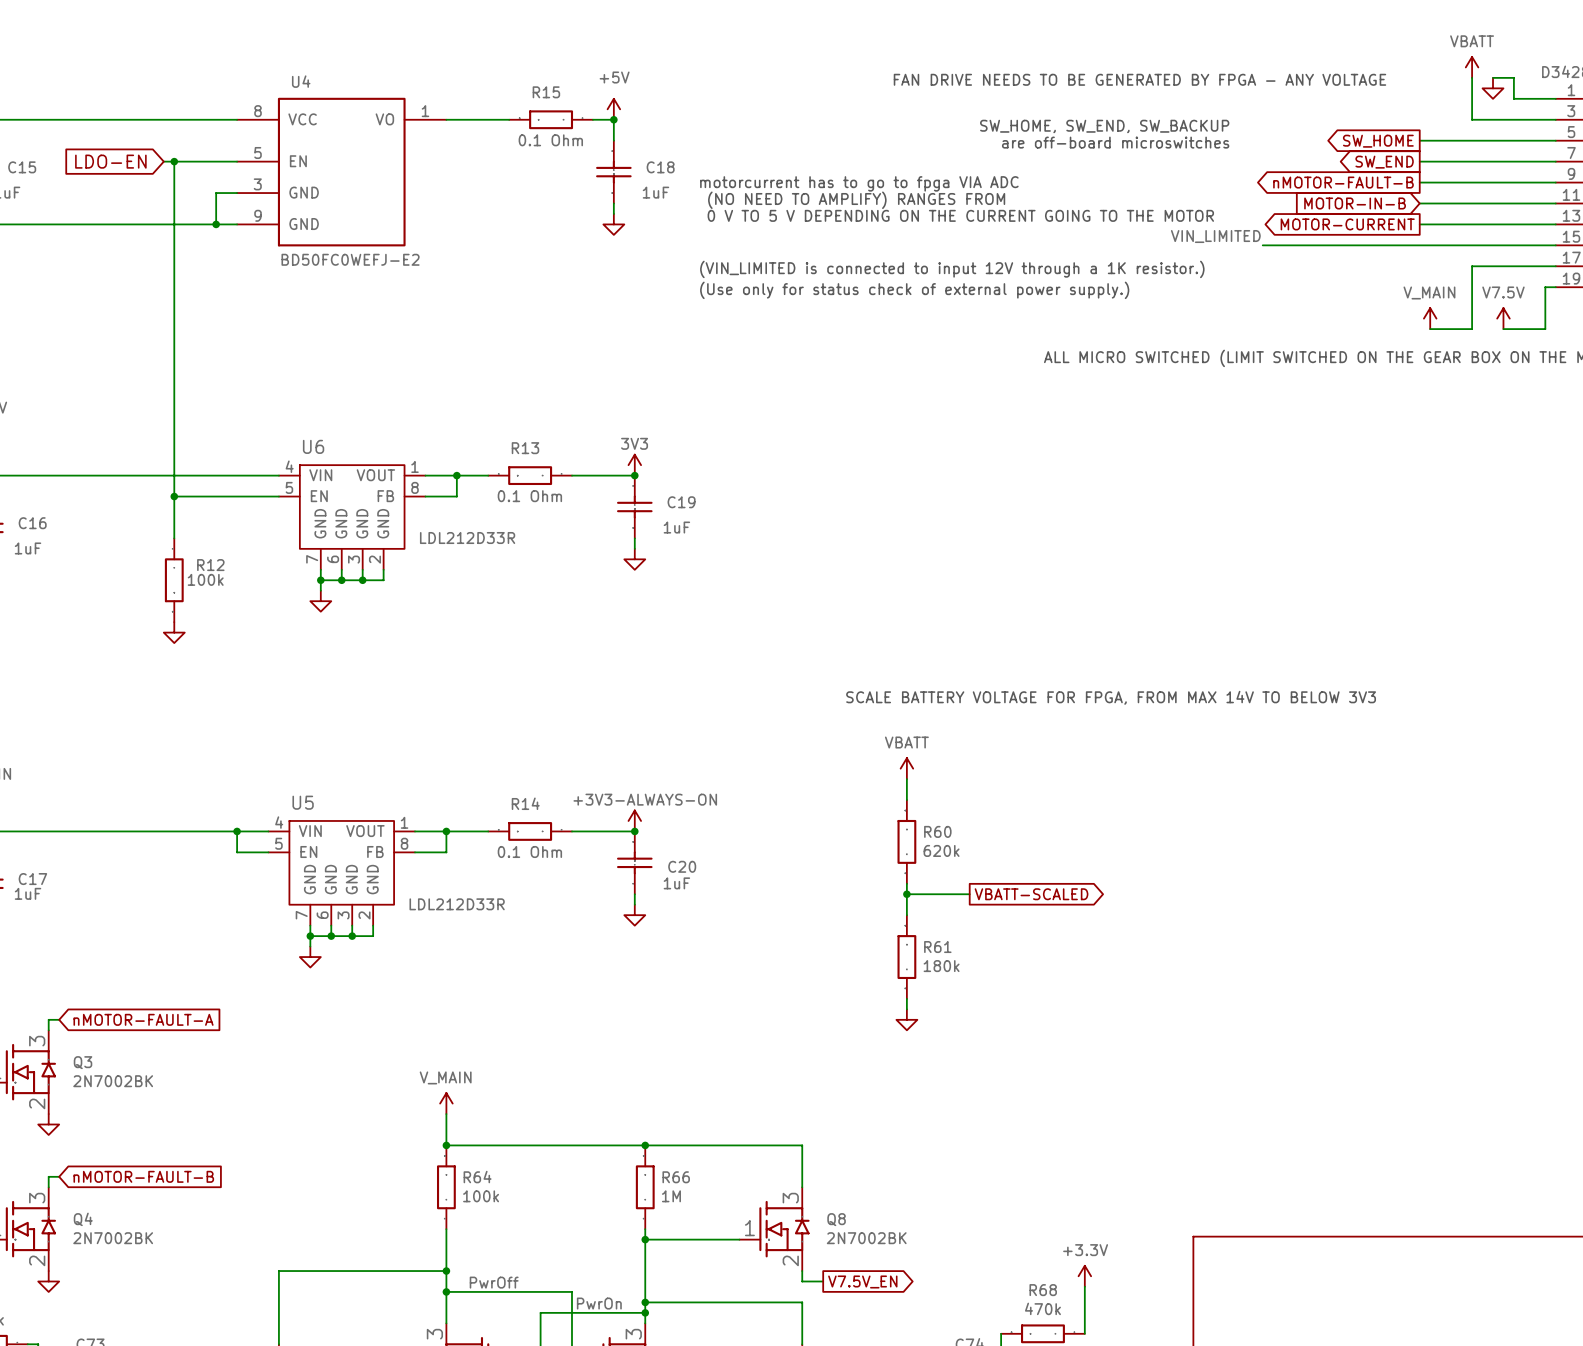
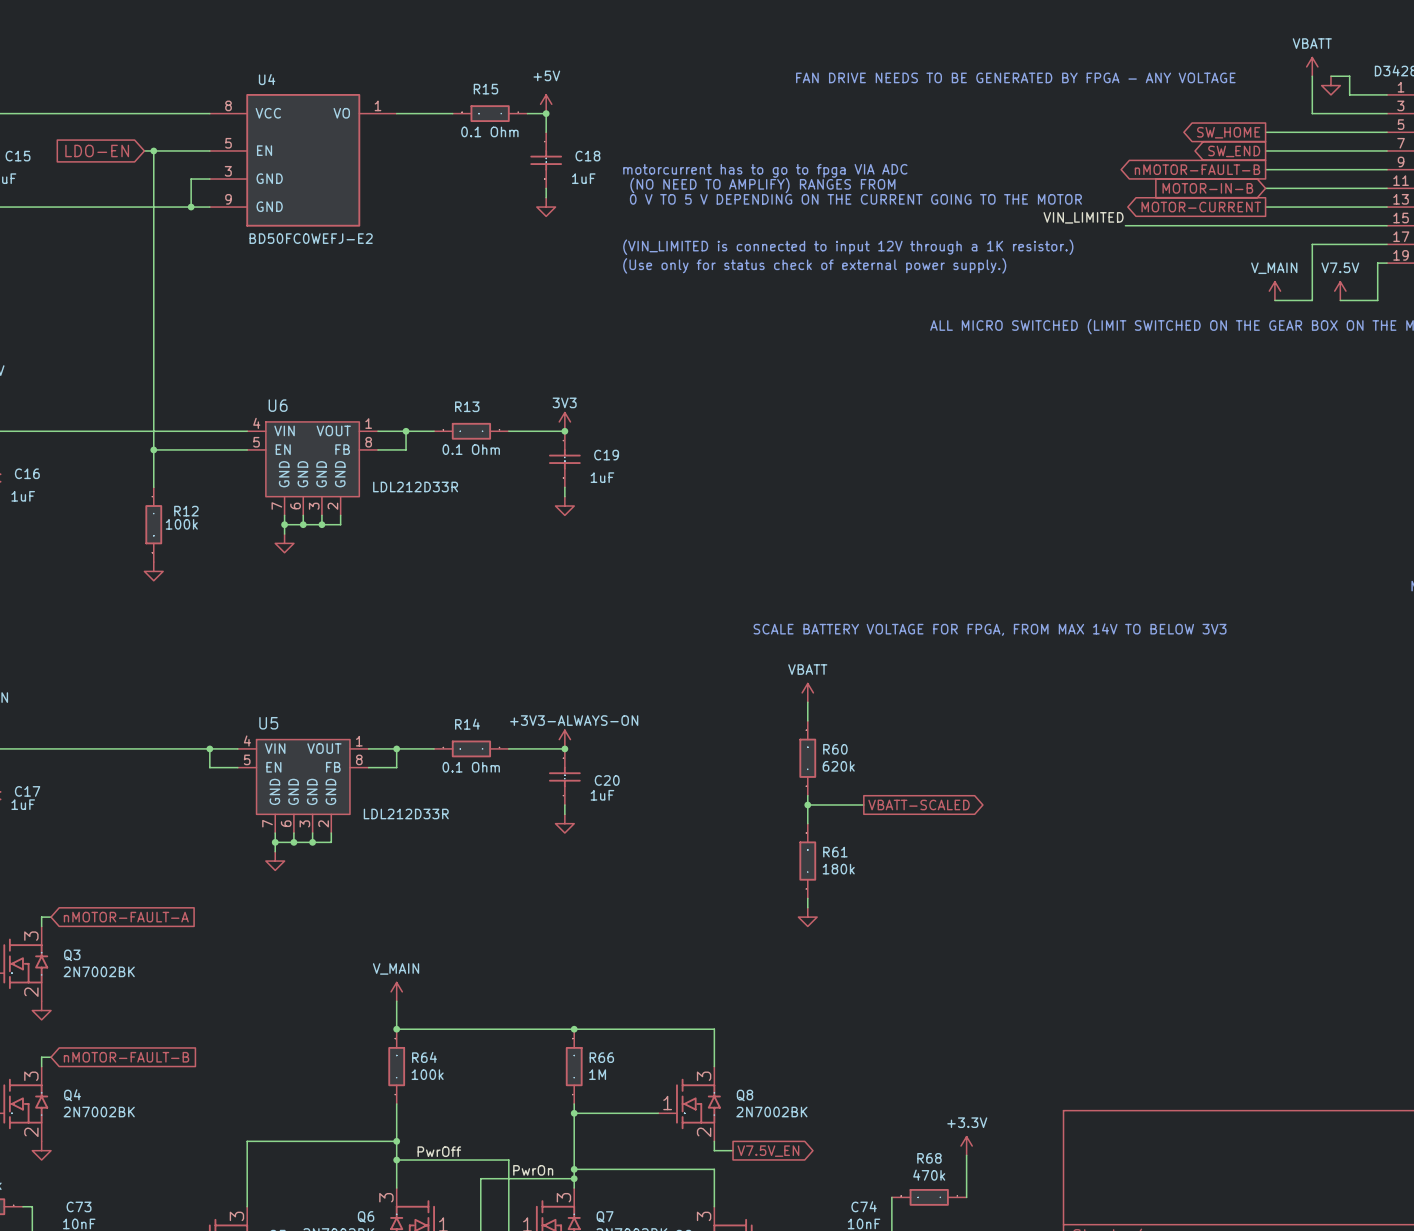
text: SW_HOME, SW_END, SW_BACKUP (1104, 126) -> none
text: are off-board microswitches (1115, 142) -> none

